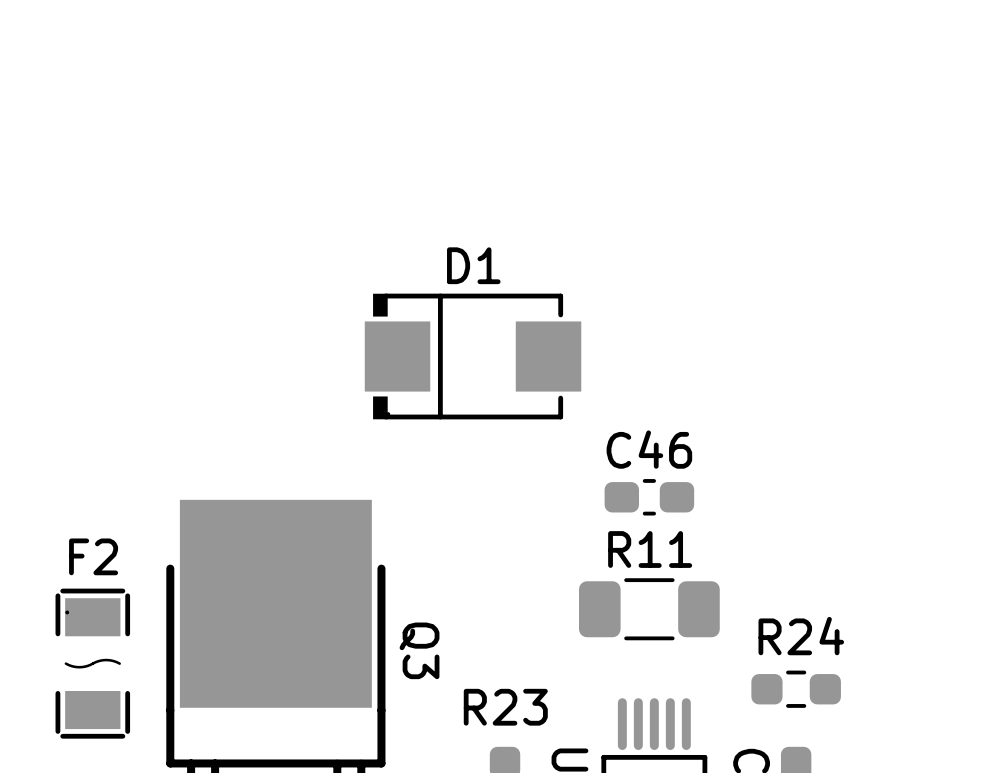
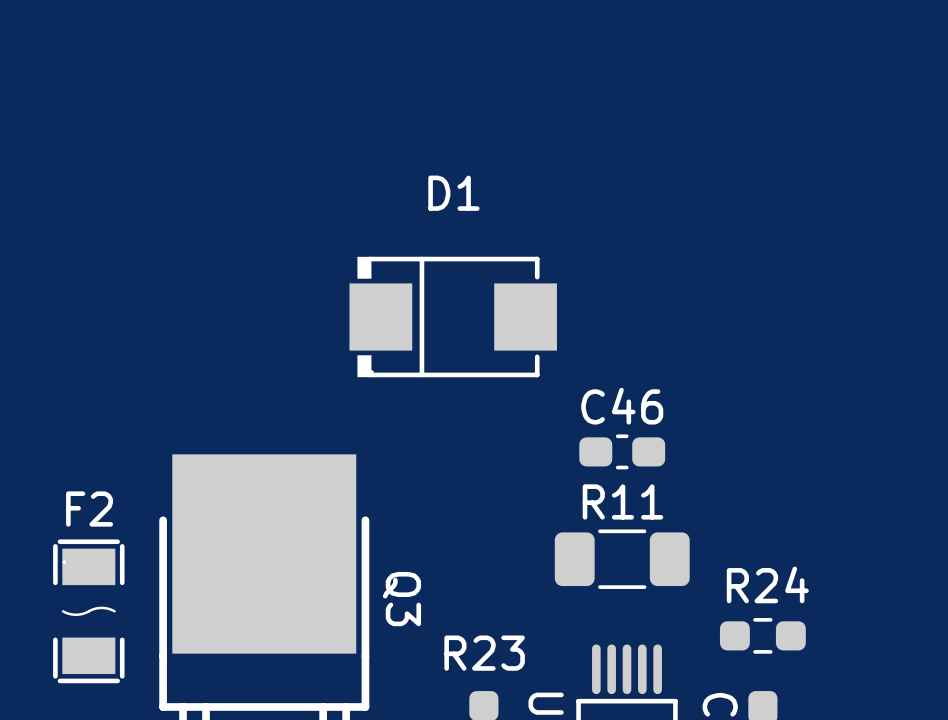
D1 name position: D1 (473, 265) -> D1 (453, 193)

